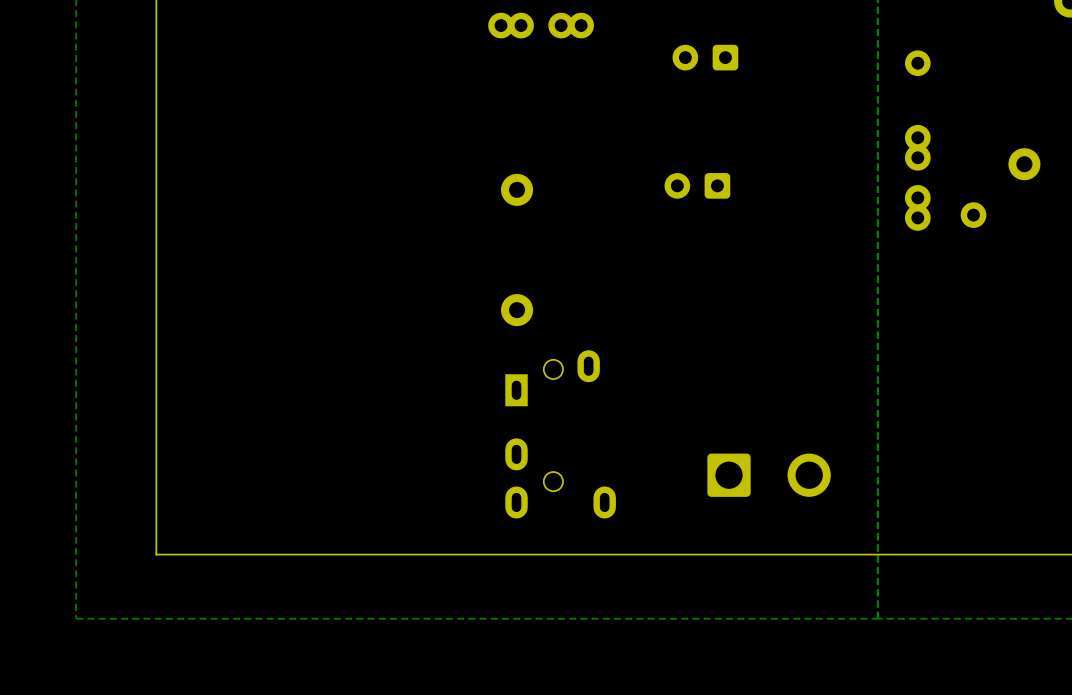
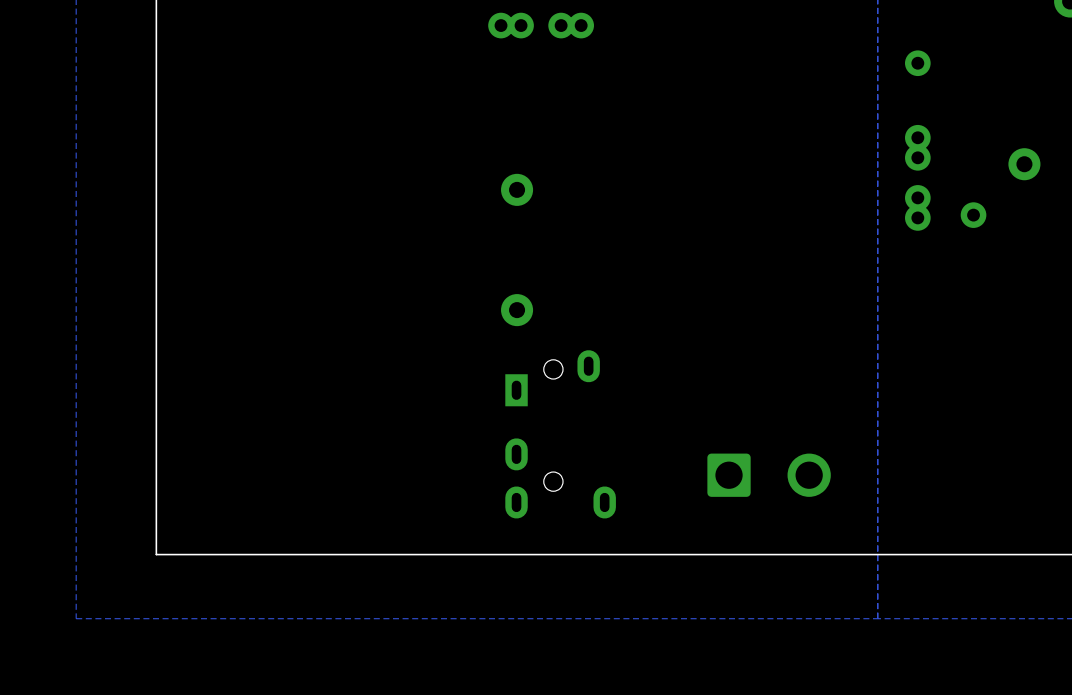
part: (705, 57) -> none
part: (697, 185) -> none

